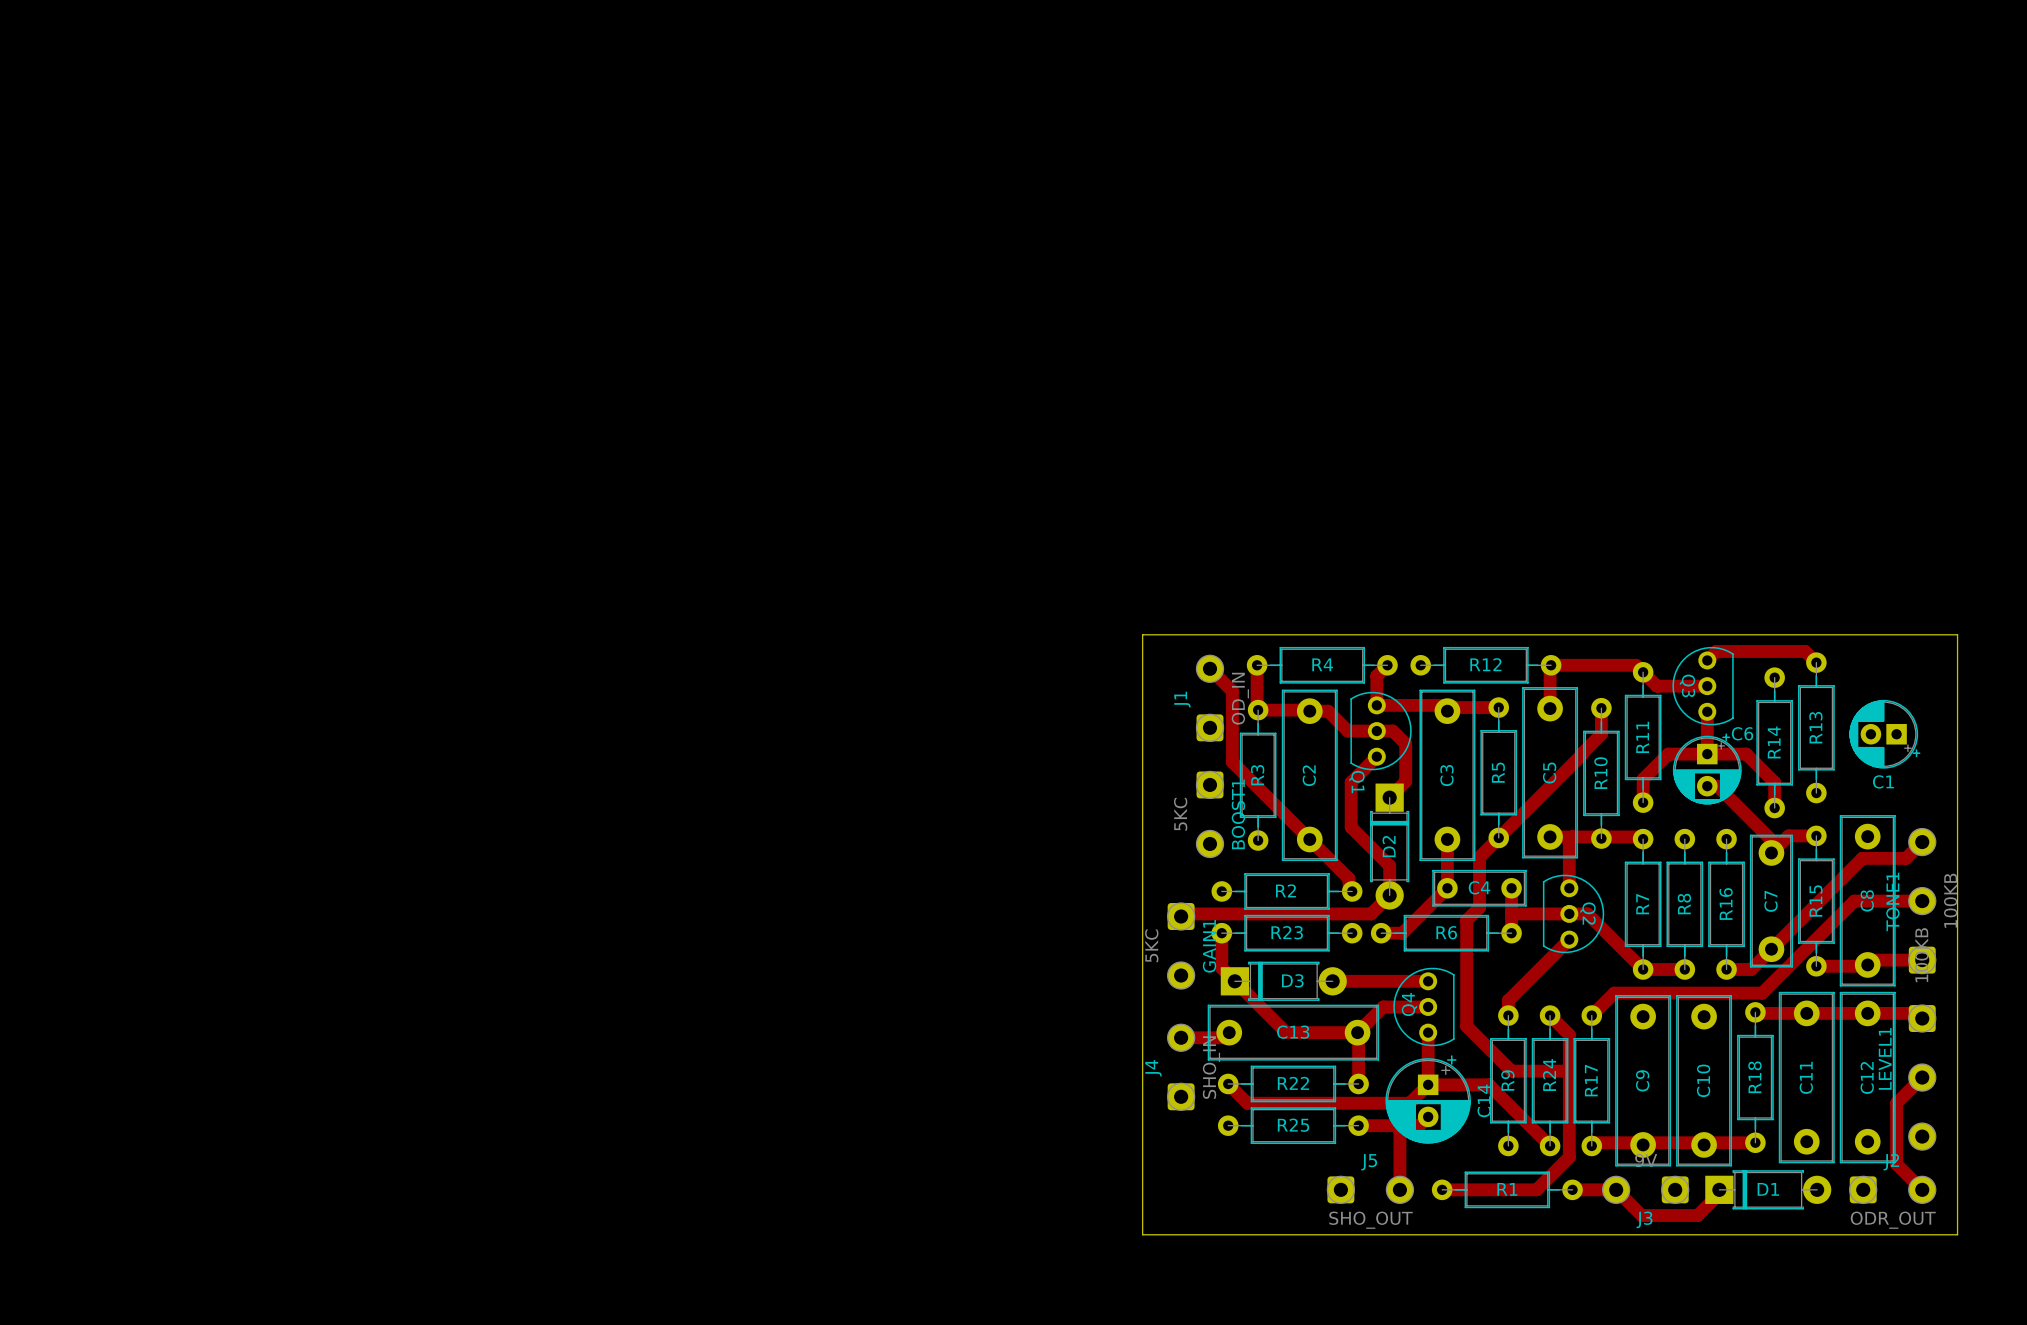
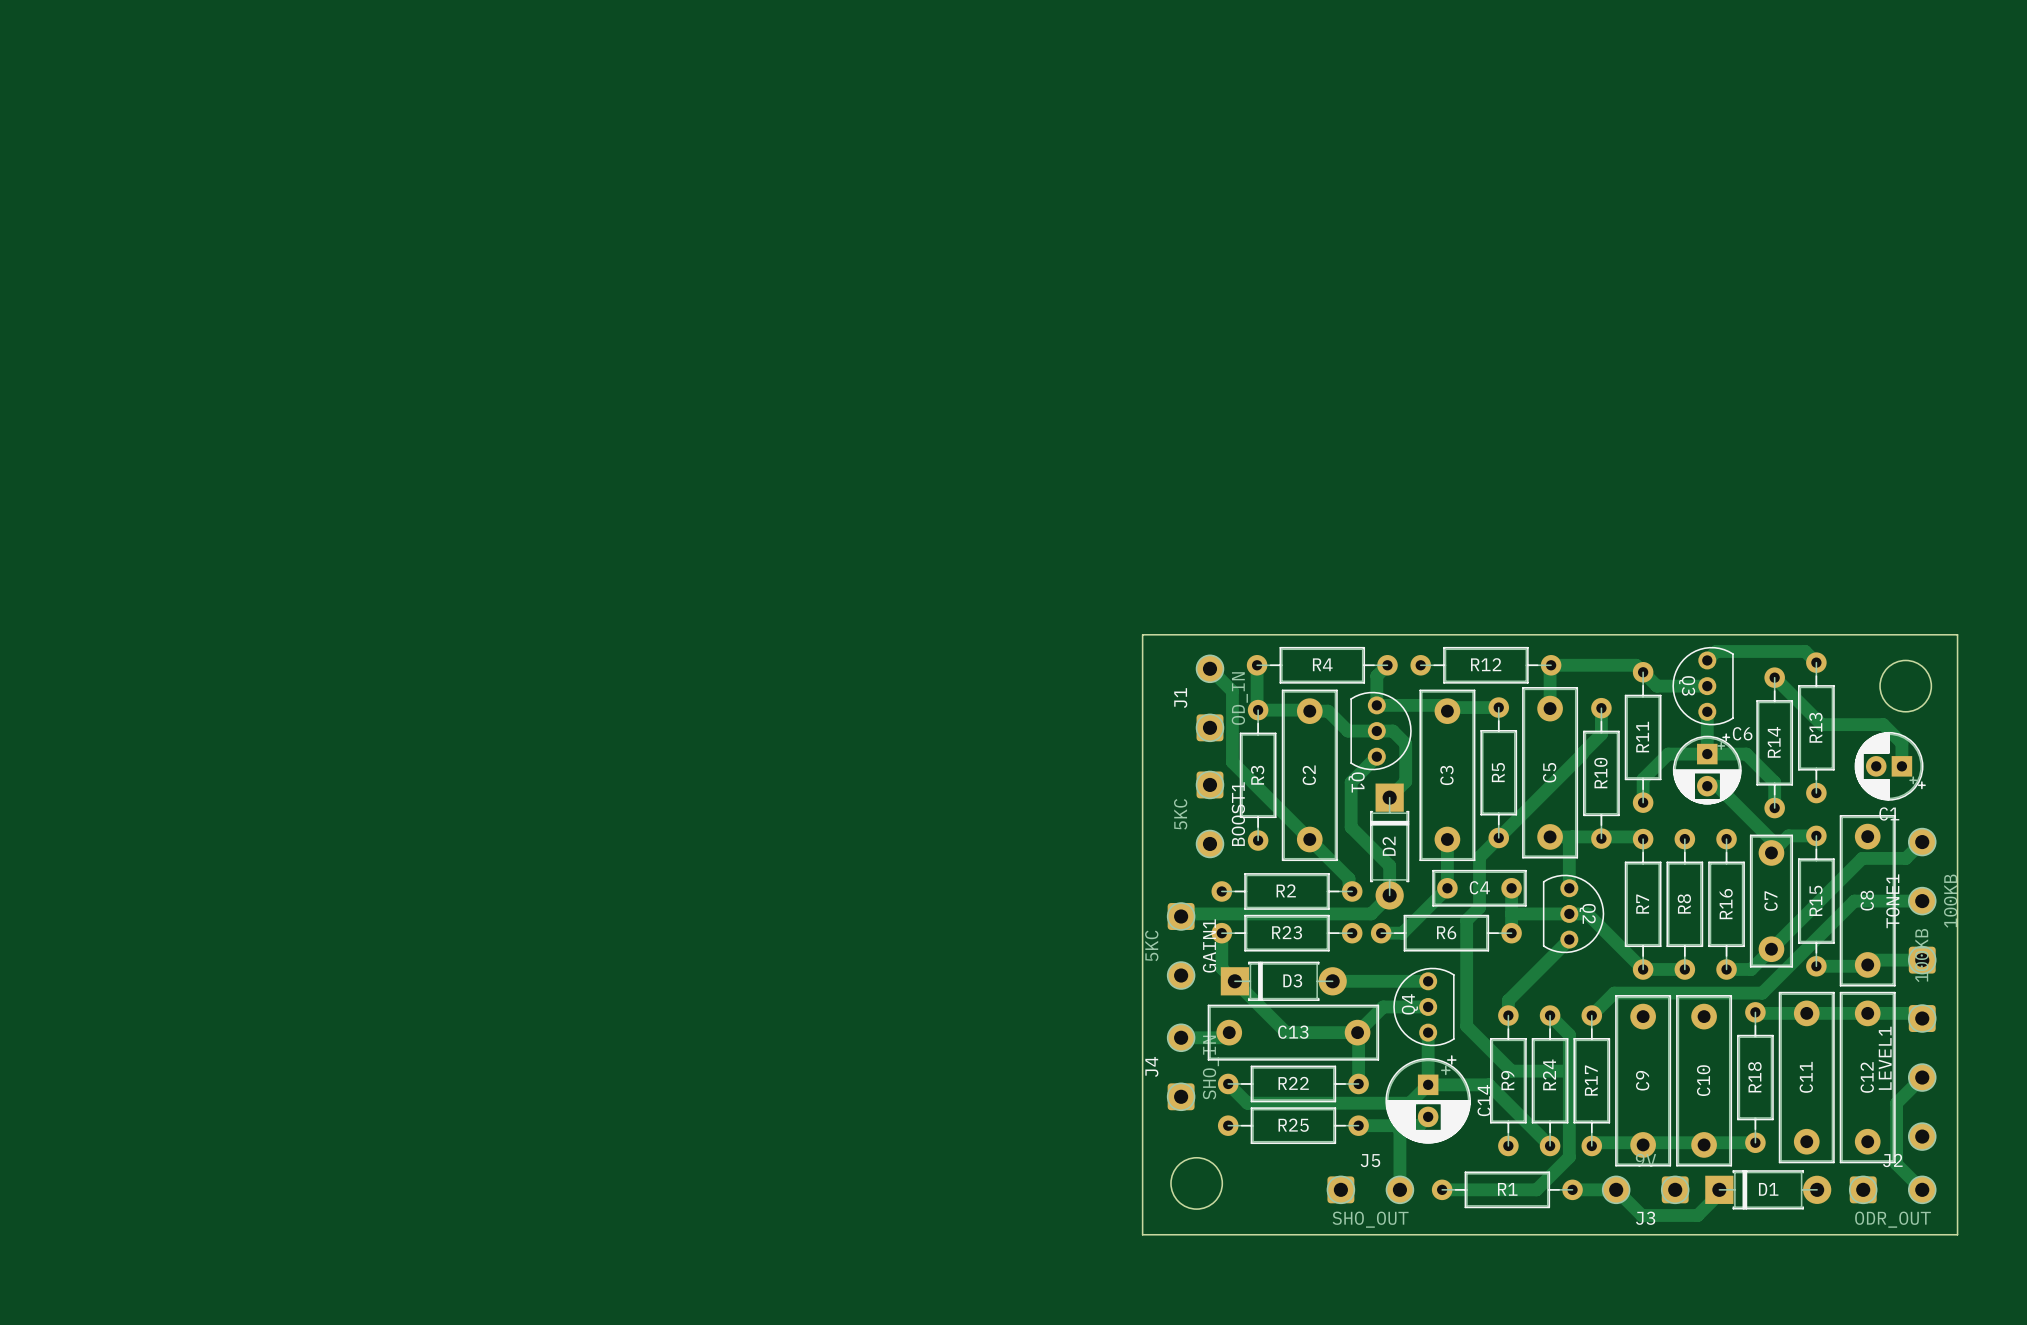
round board edge: none -> [1879, 659, 1933, 713]
track: none -> (1774, 677) (1821, 724) (1883, 724) (1901, 743) (1901, 766)
C1 position: (1884, 734) -> (1890, 766)
round board edge: none -> [1170, 1157, 1223, 1210]

